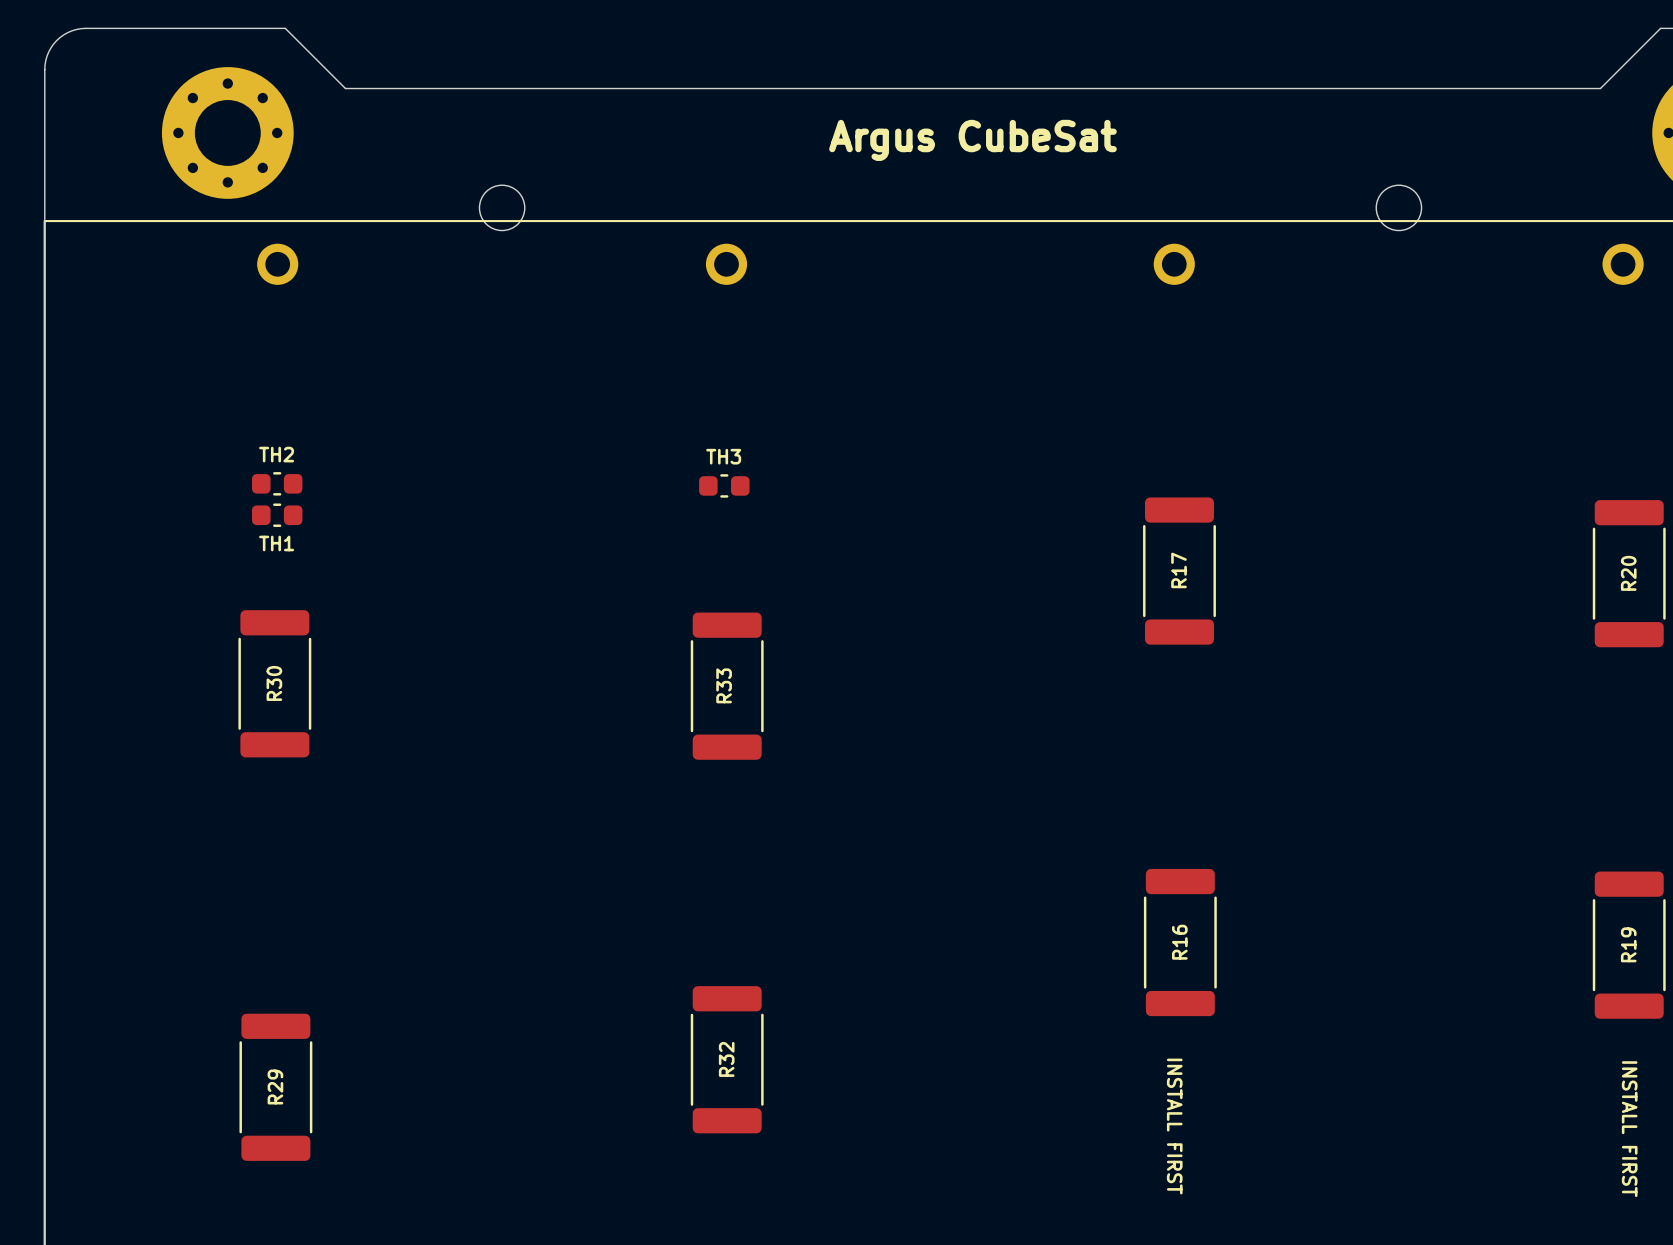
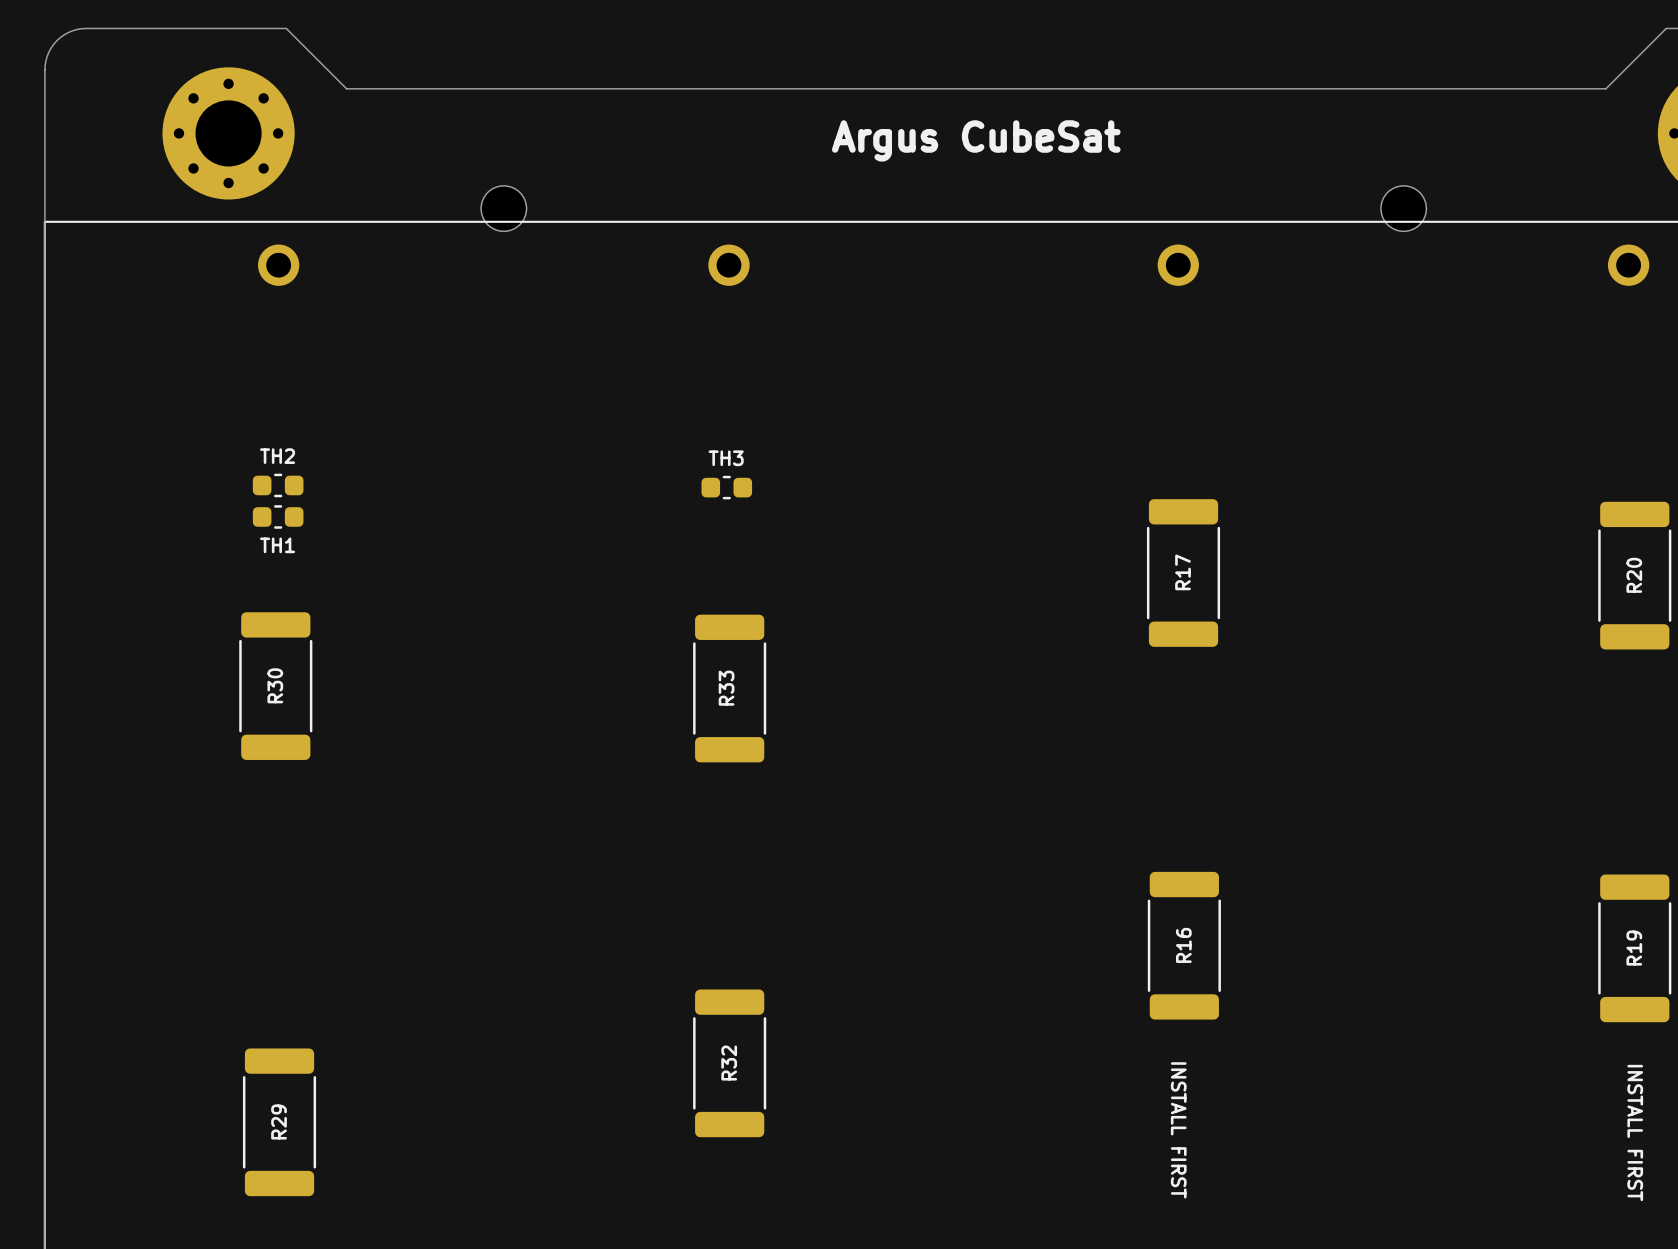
R29 position: (275, 1087) -> (279, 1122)

